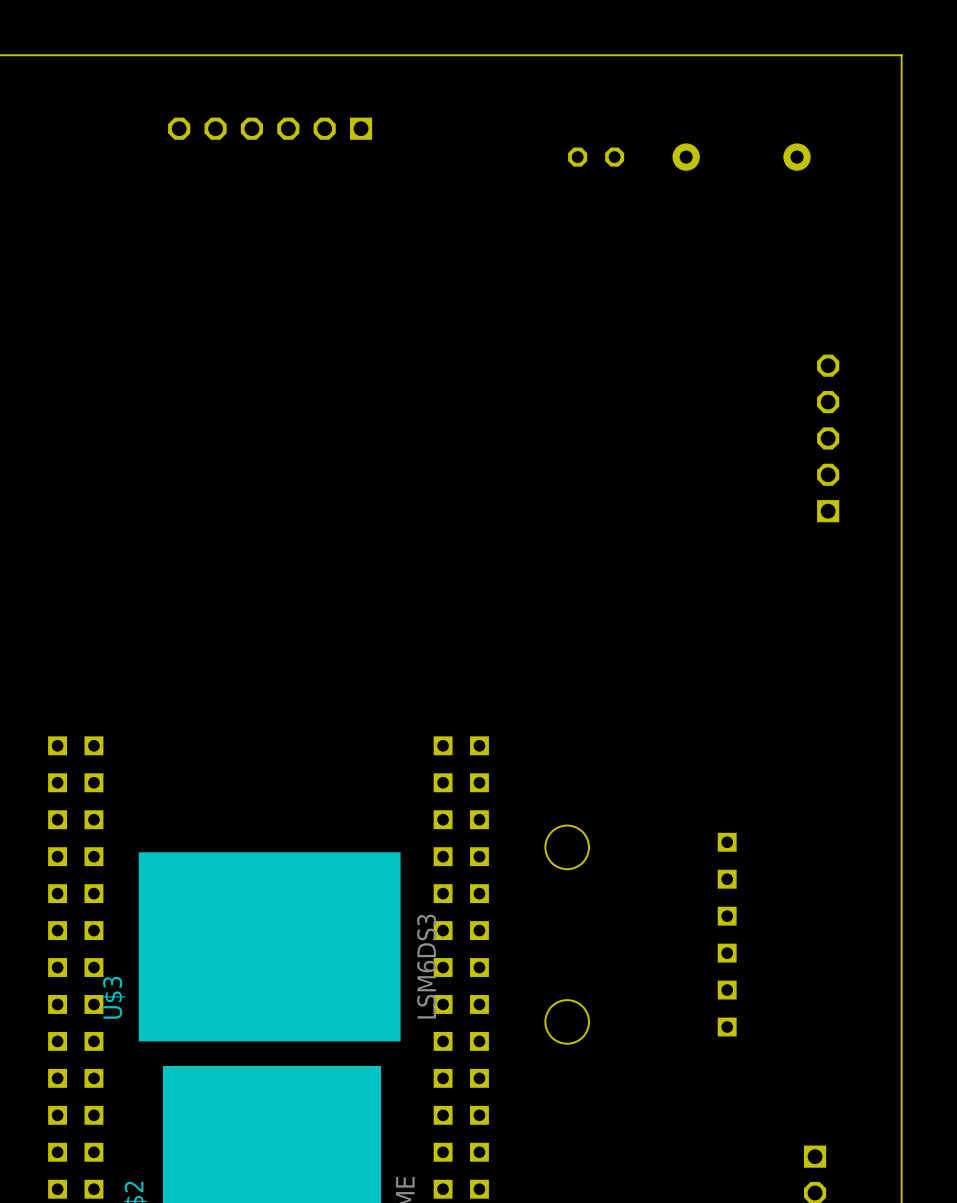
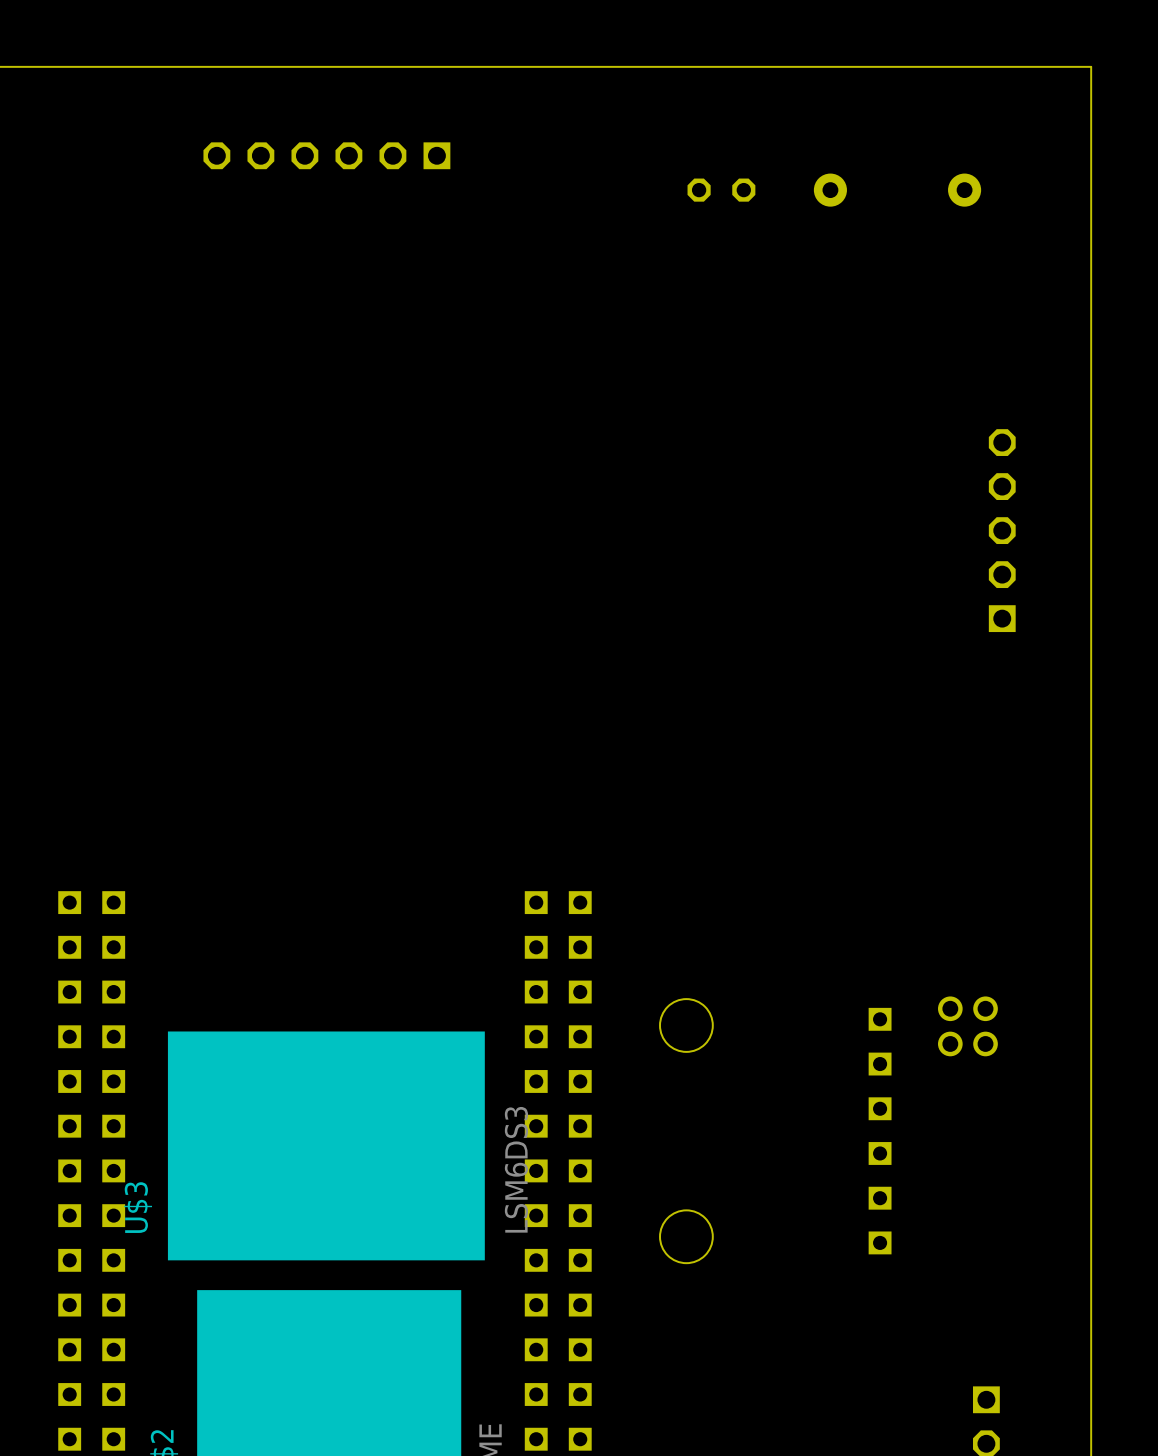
part: none -> (950, 1026)
part: none -> (985, 1026)

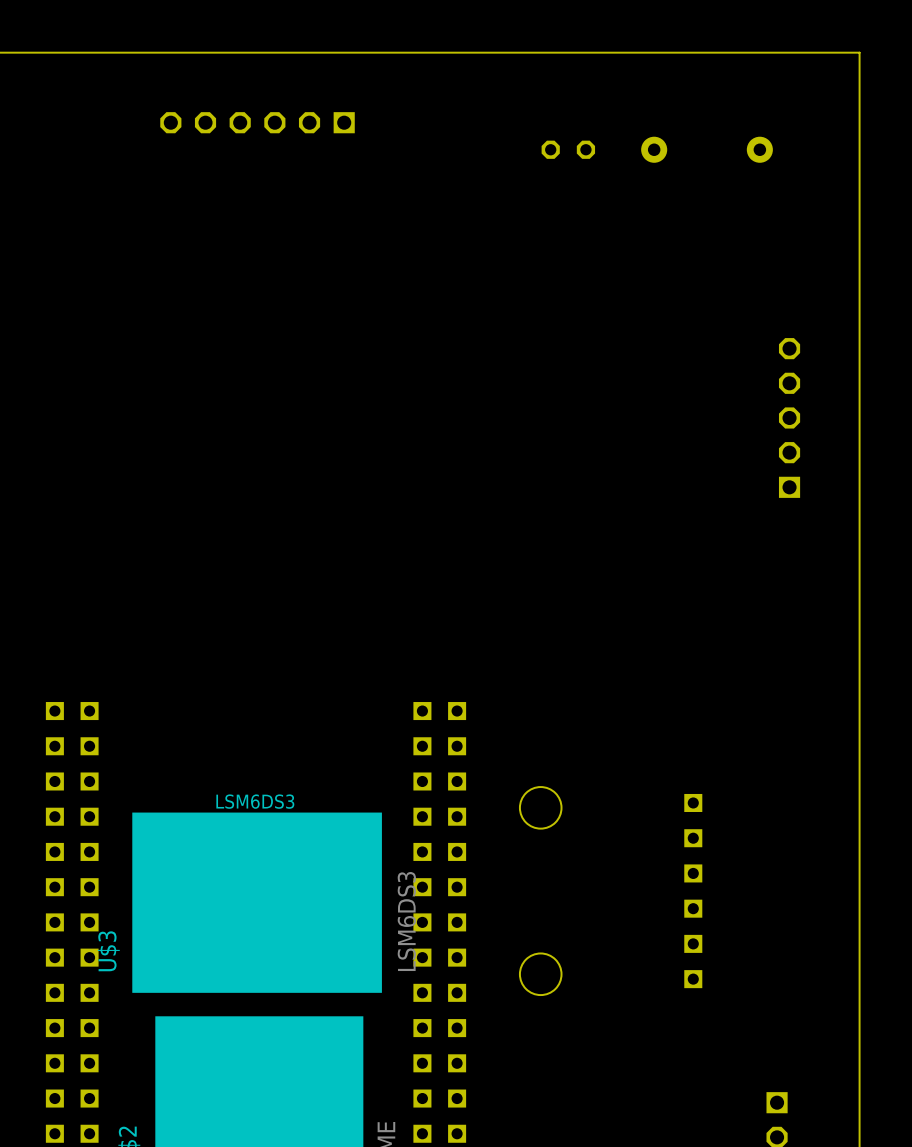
text: none -> LSM6DS3 (255, 801)
part: (950, 1026) -> none
part: (985, 1026) -> none

